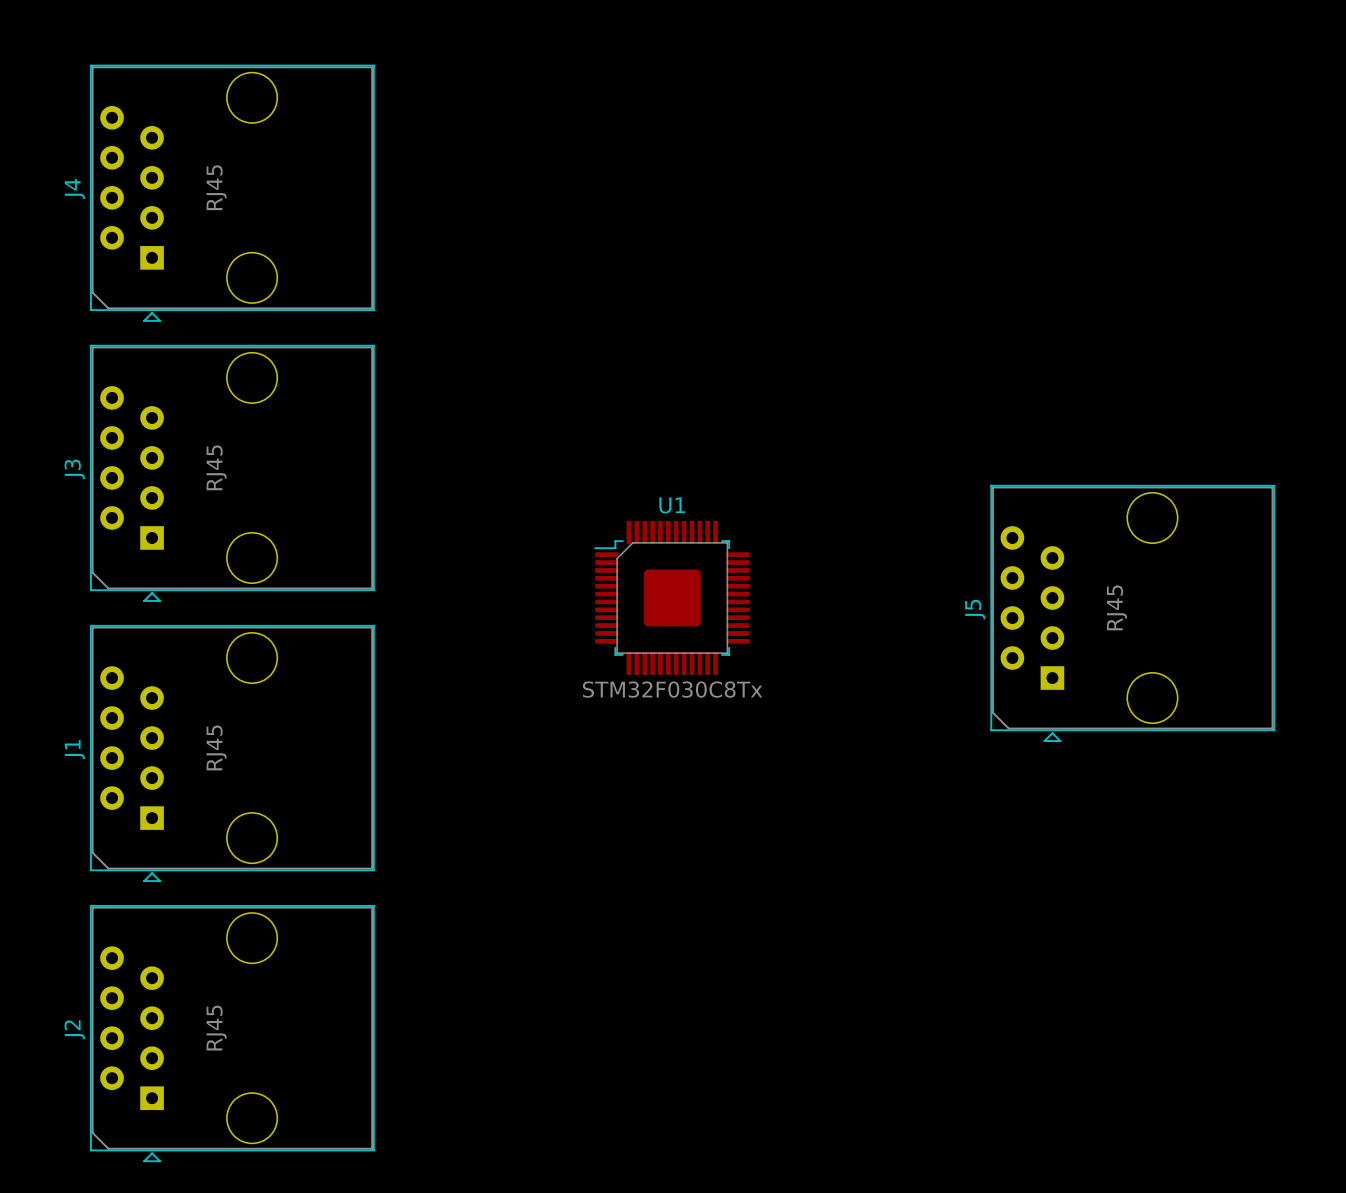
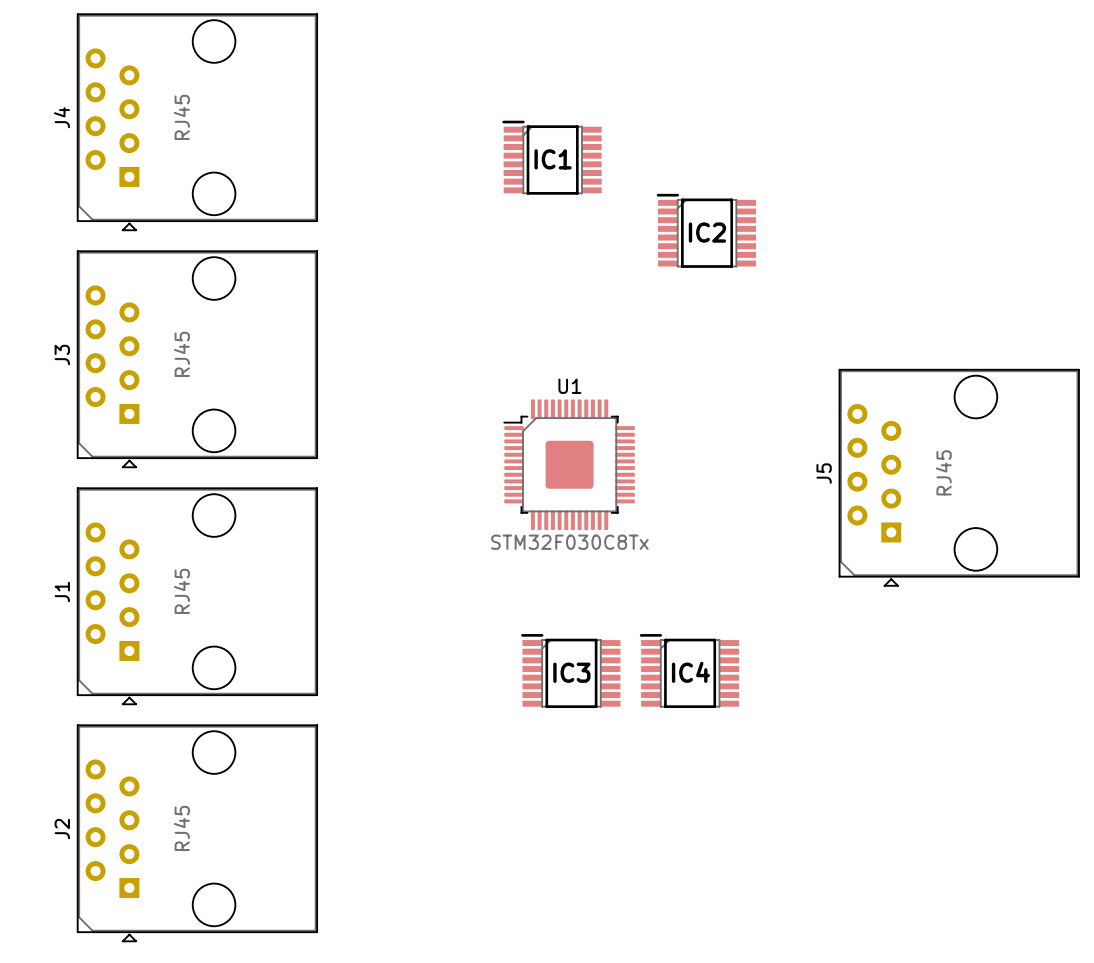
IC1: none -> (552, 157)
IC2: none -> (706, 230)
IC3: none -> (570, 671)
IC4: none -> (689, 671)

